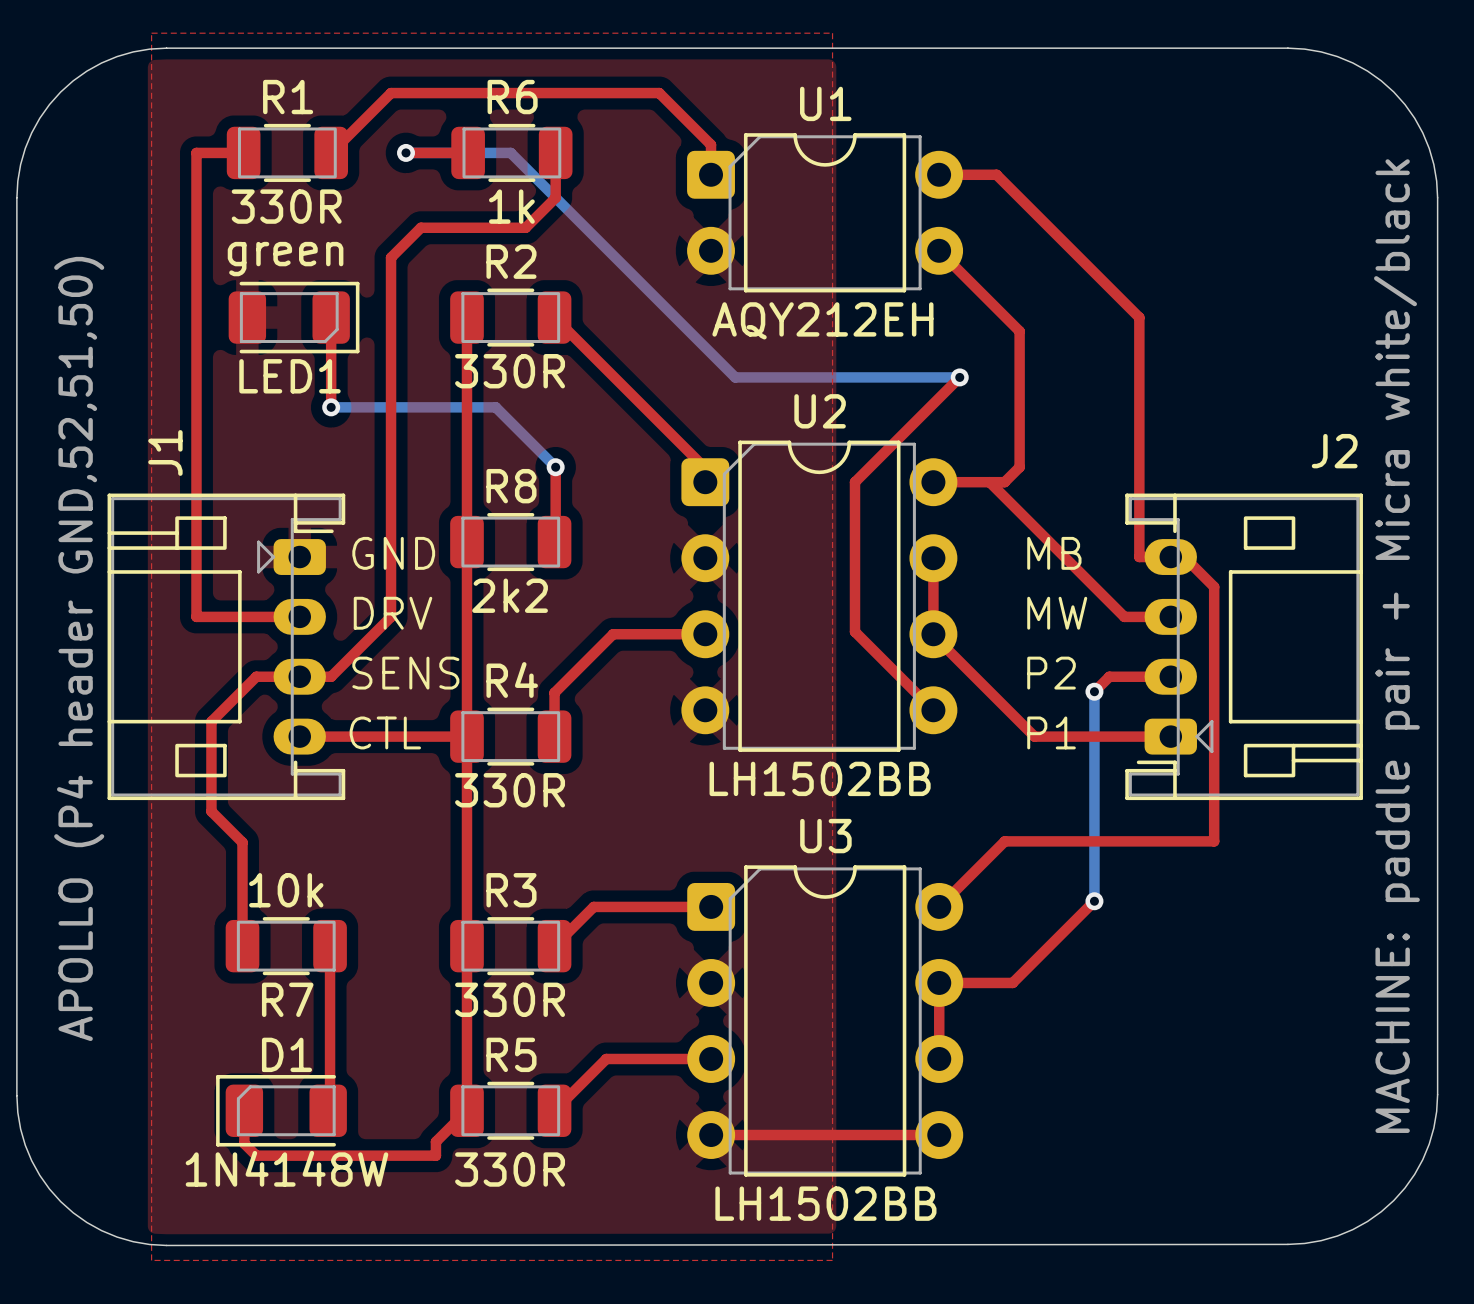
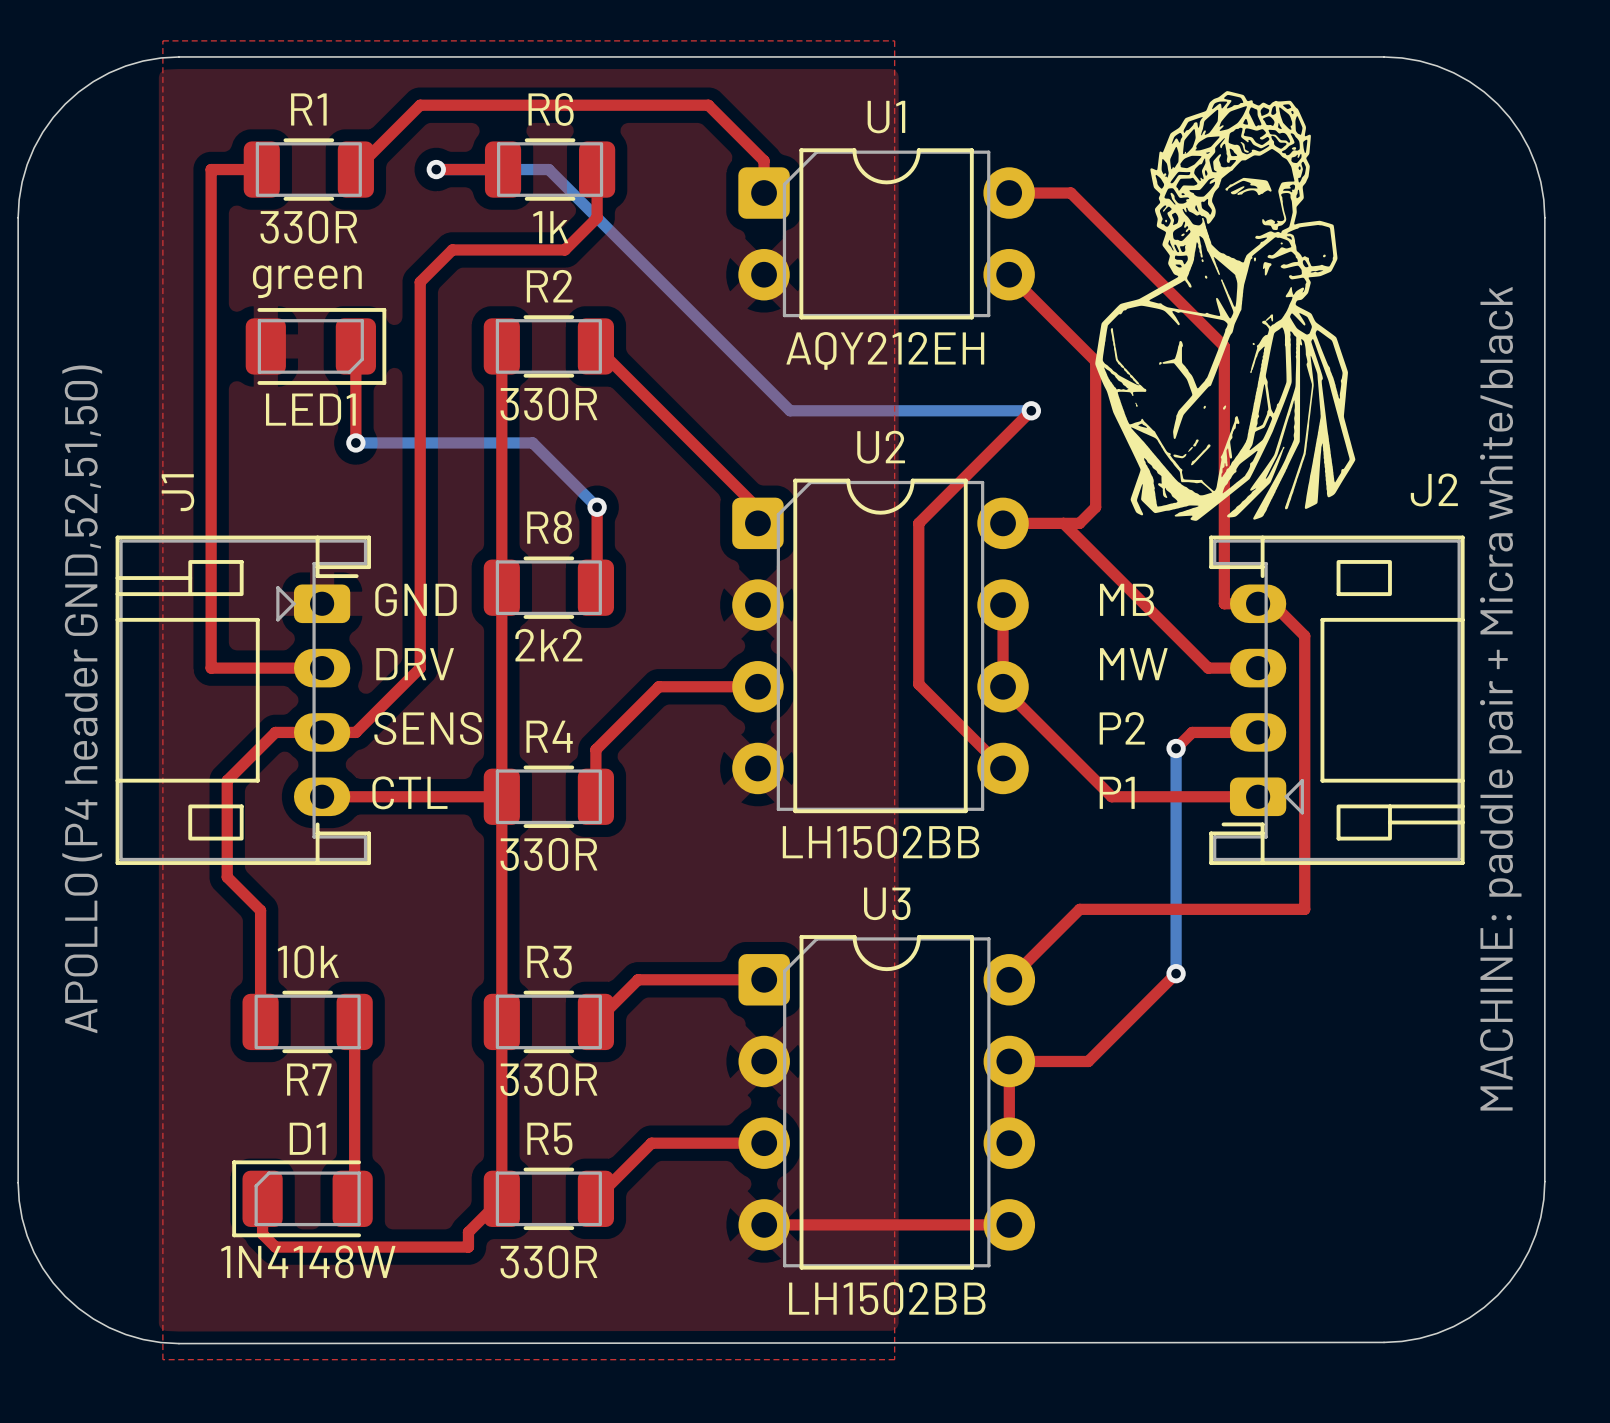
drawing: none -> [1095, 91, 1356, 521]

